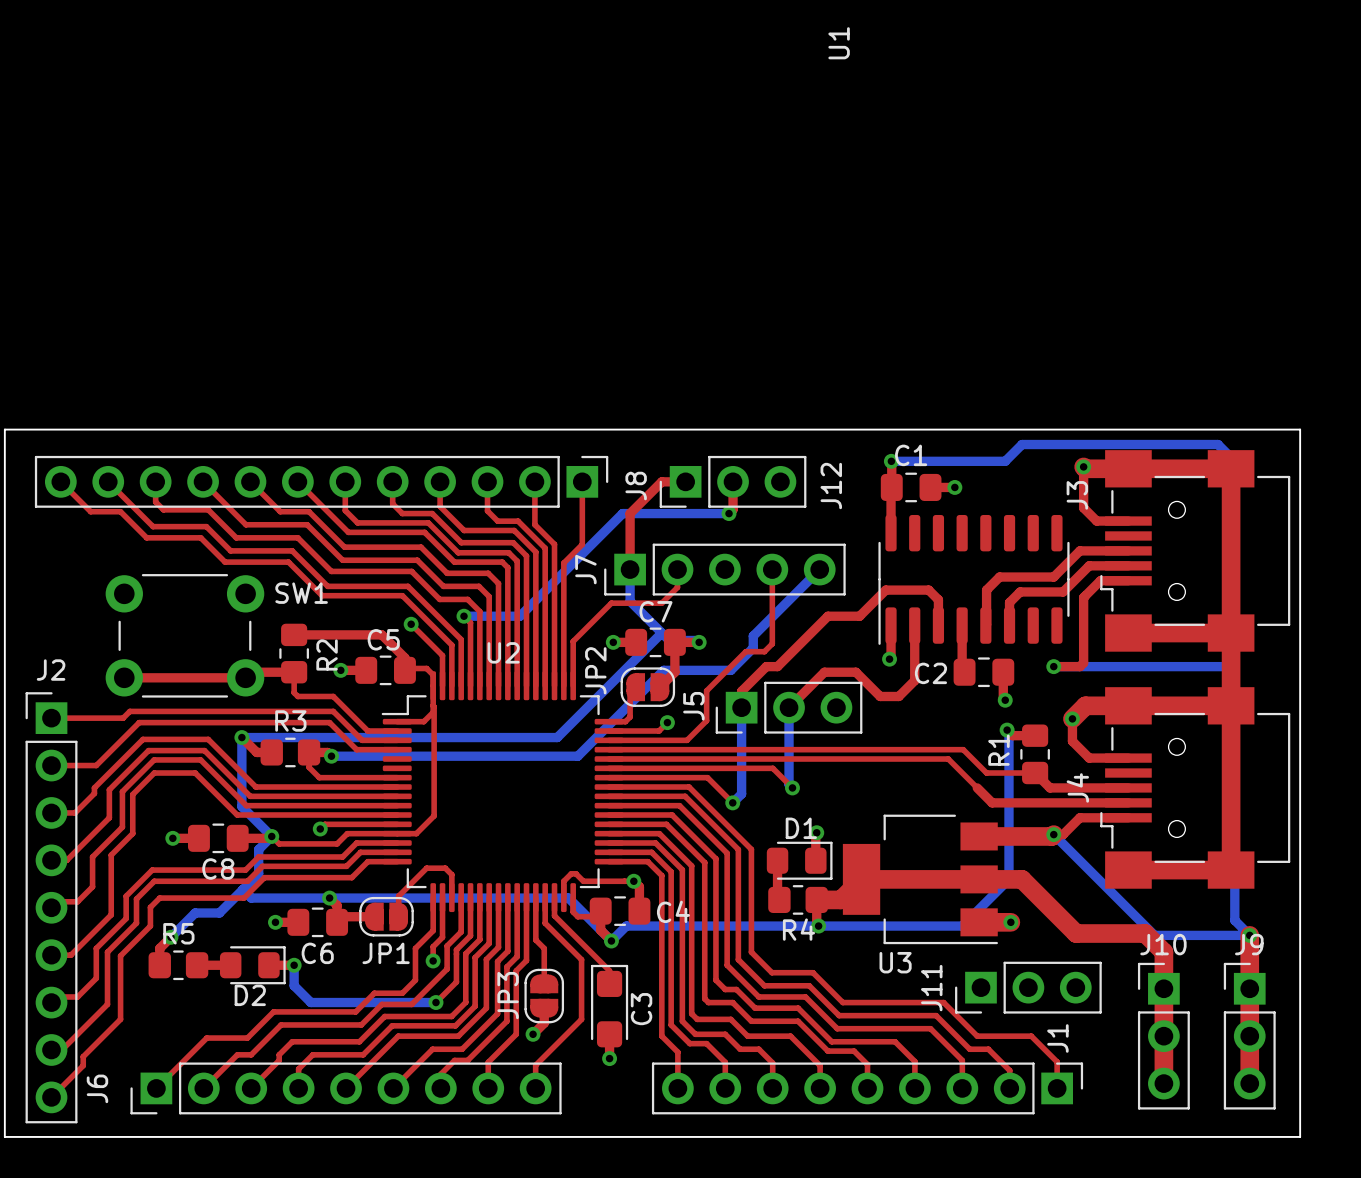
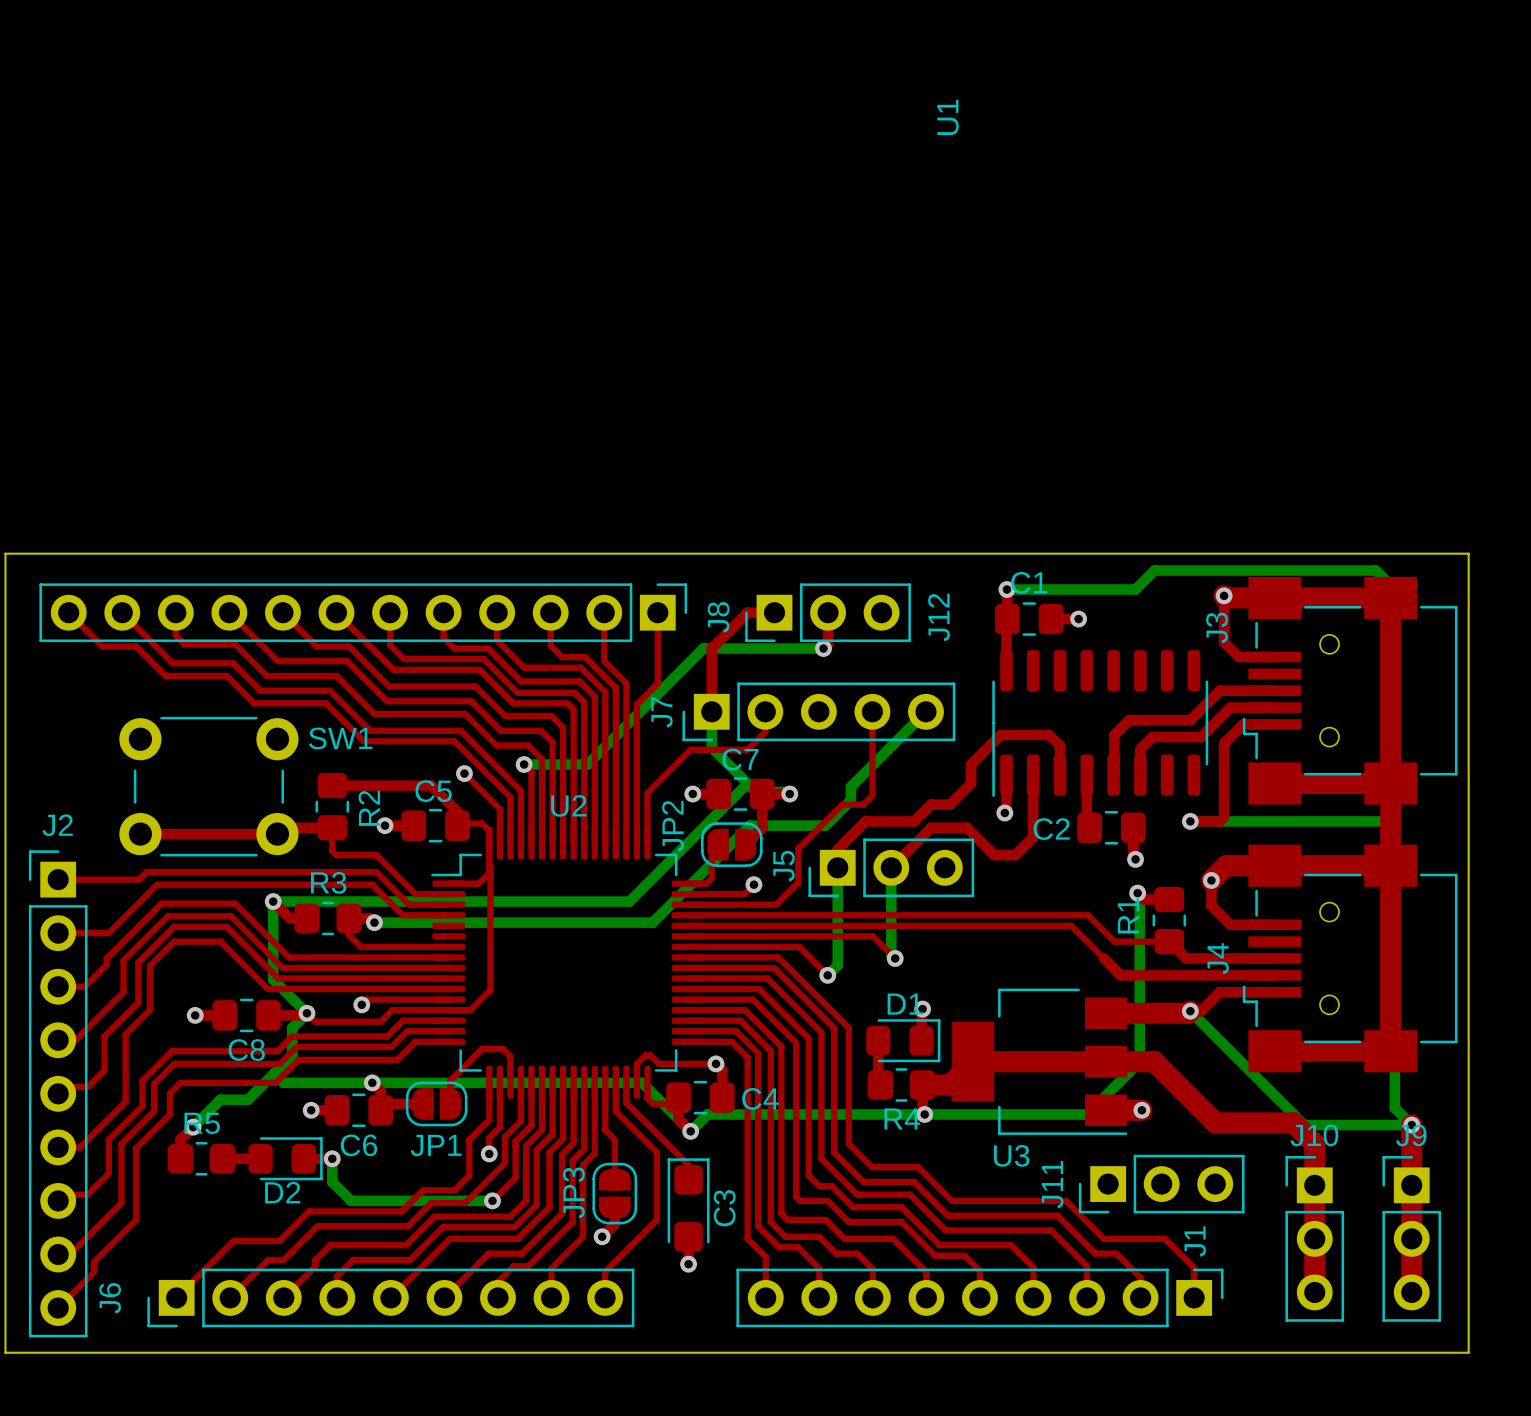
top track: (859, 616) (827, 616) (777, 666) -> (971, 764) (971, 783) (950, 804) (931, 804) (914, 821) (878, 821)

